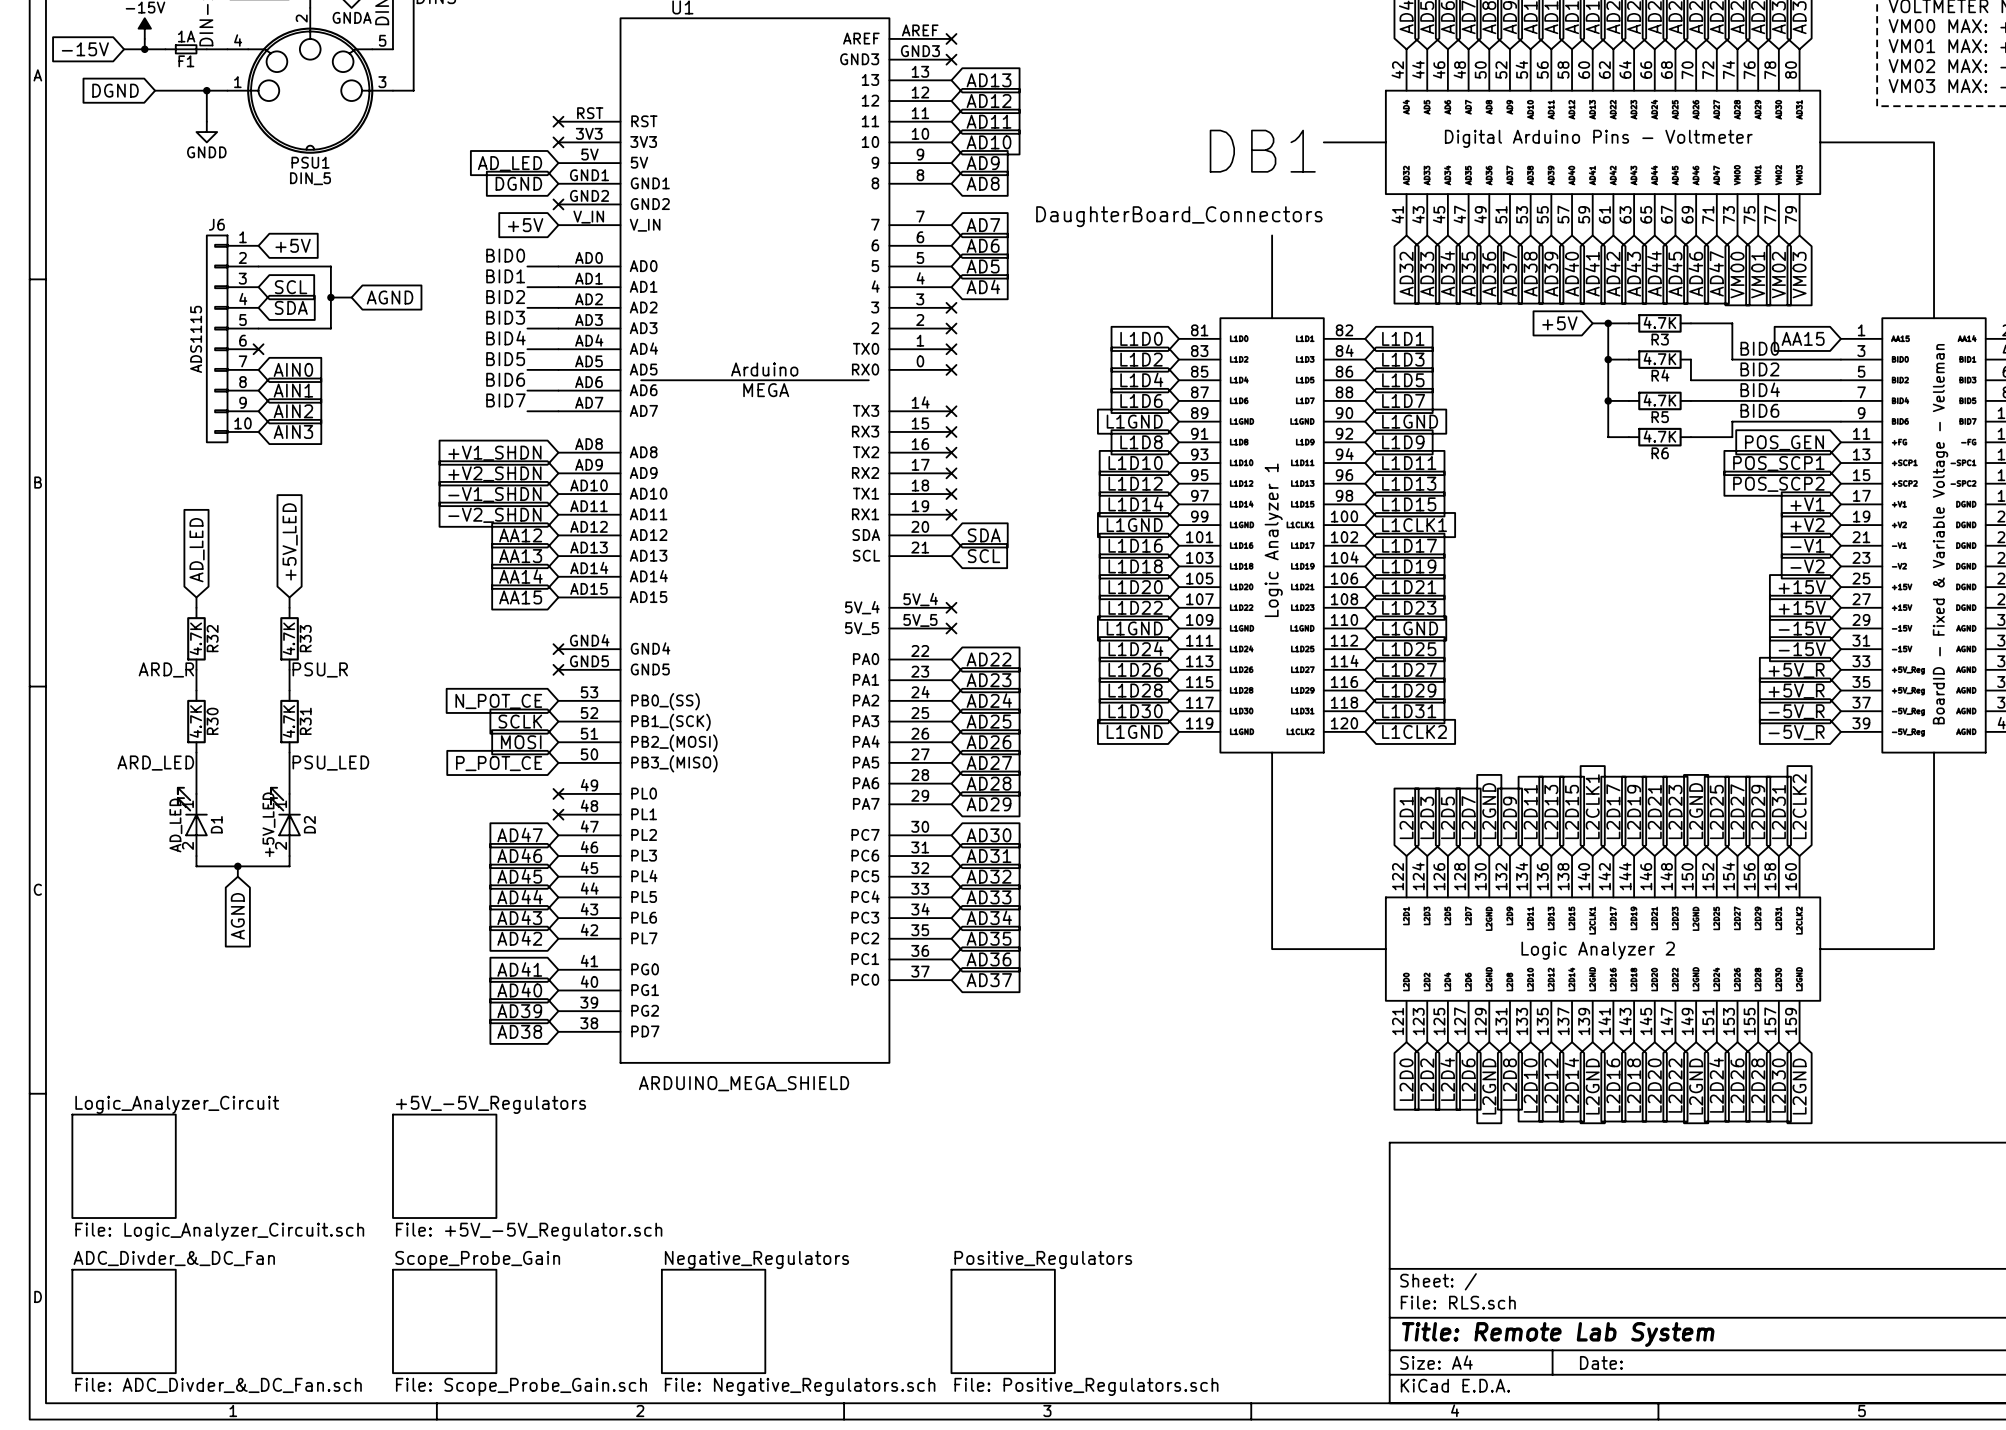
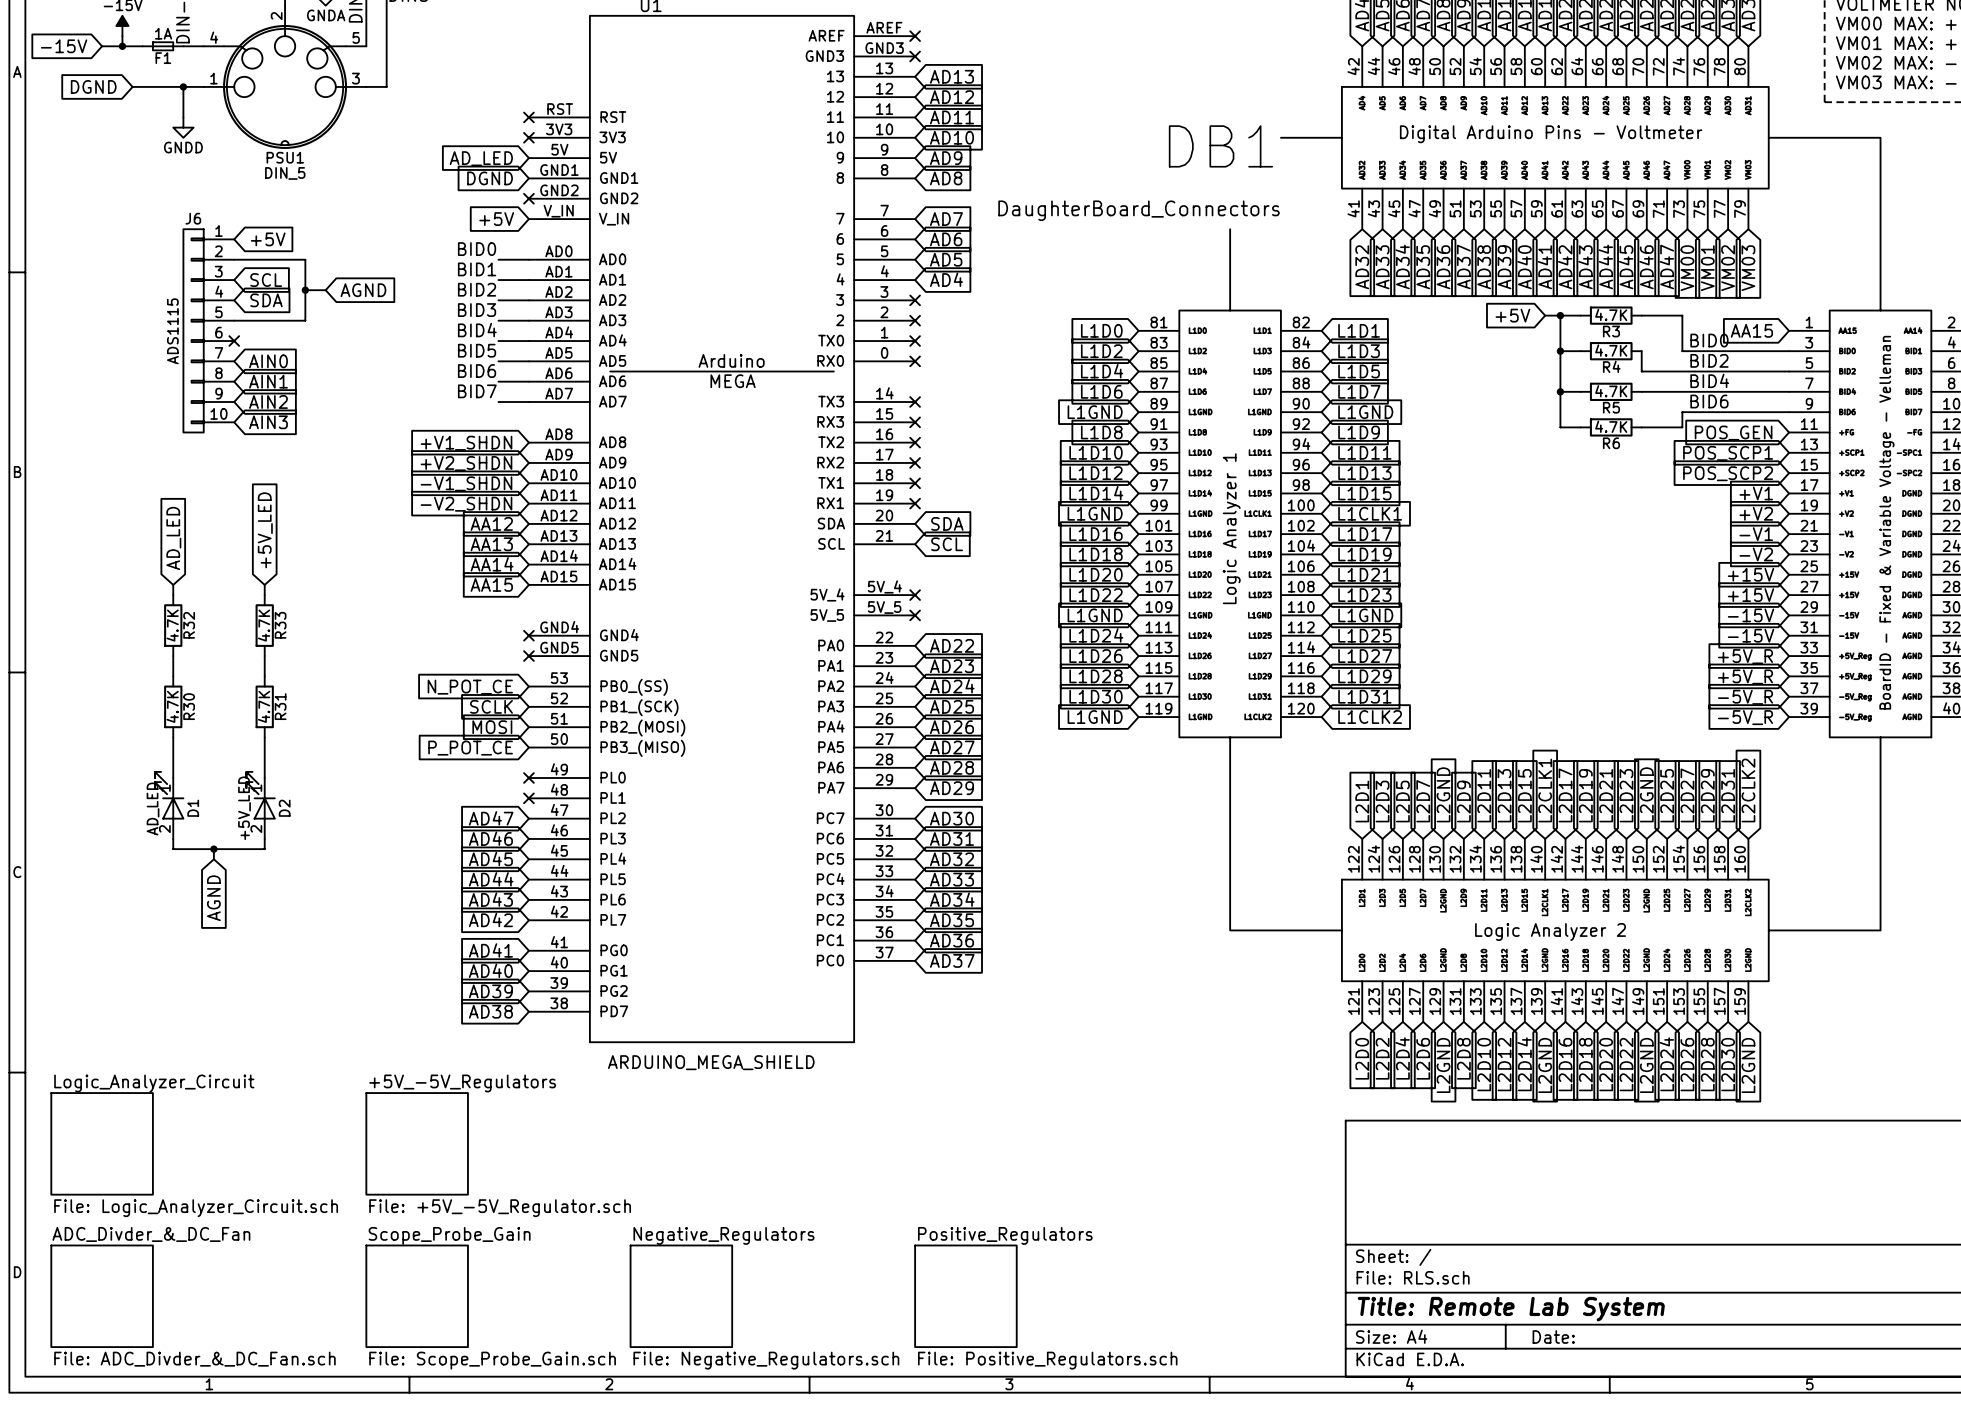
label: ARD_R (166, 669) -> none
label: PSU_R (320, 669) -> none
label: ARD_LED (155, 763) -> none
label: PSU_LED (330, 763) -> none

